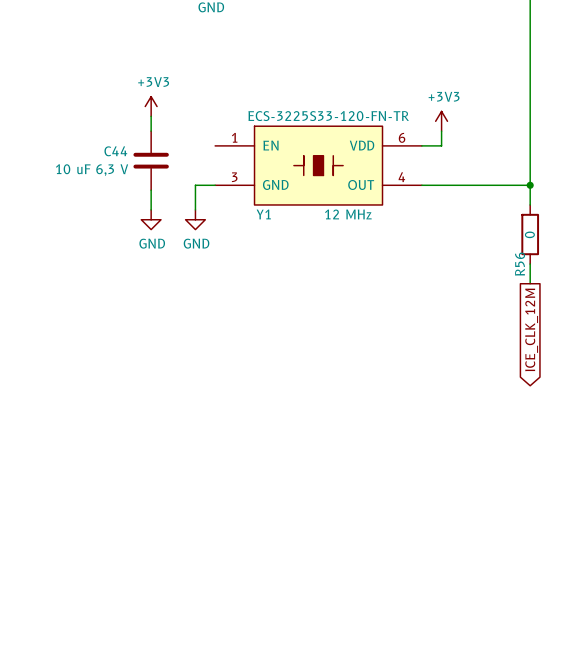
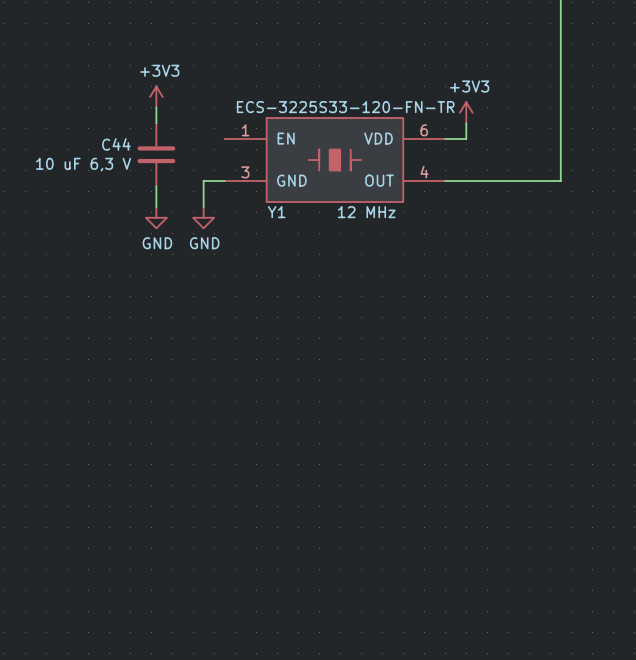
wire: (530, 185) (530, 204) -> none
junction: (530, 185) -> none
R56: 0 (530, 234) -> none
wire: (530, 264) (530, 283) -> none
global label: ICE_CLK_12M (531, 329) -> none

